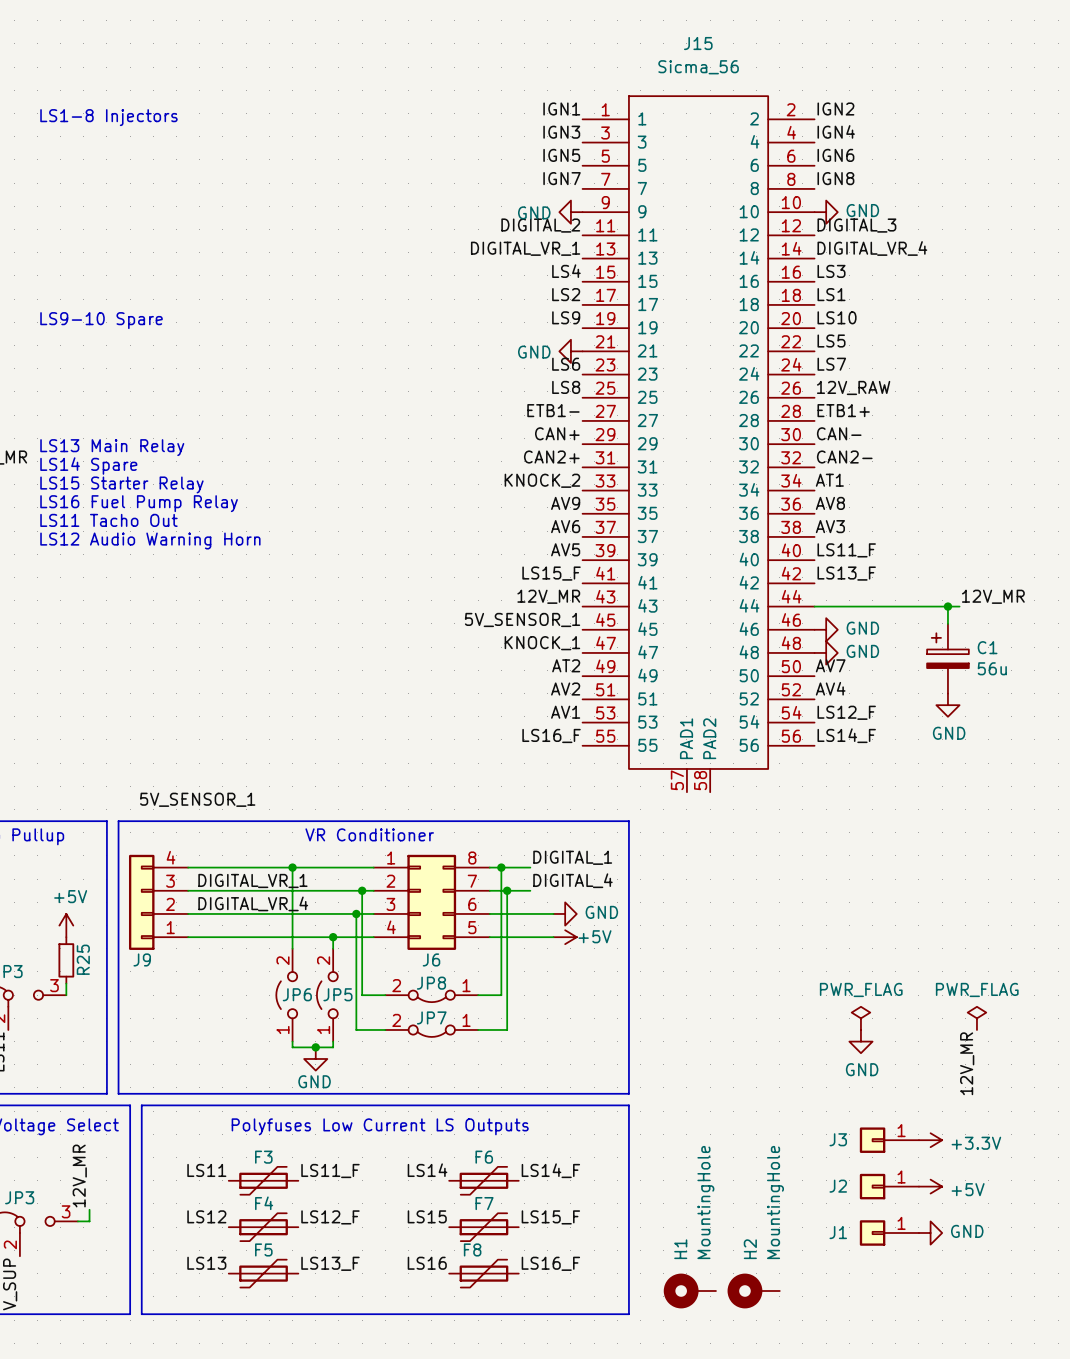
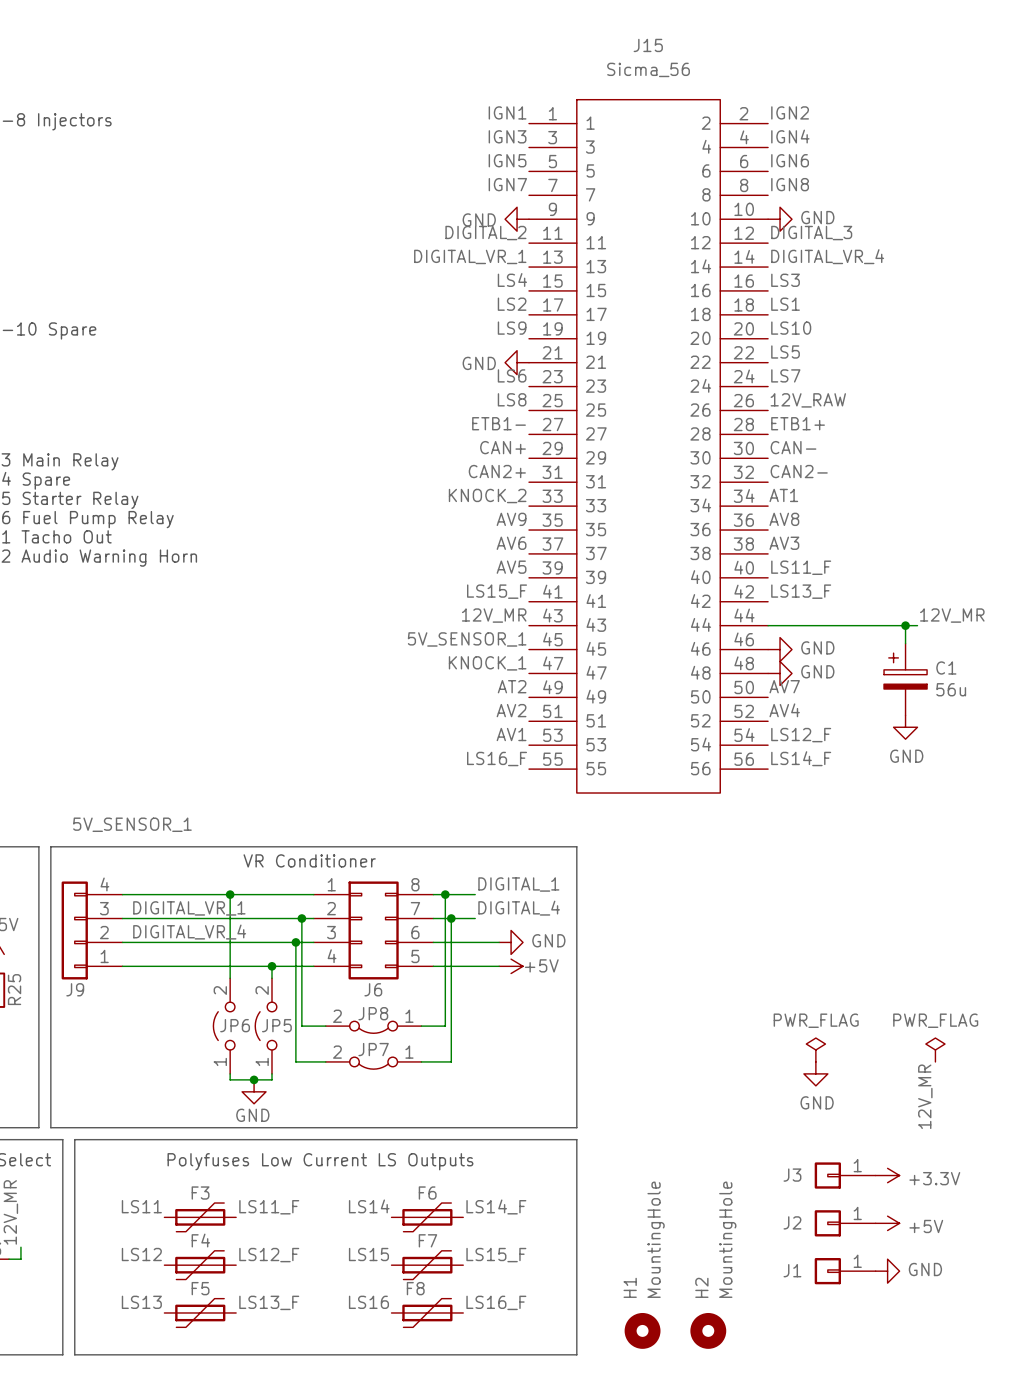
J15 symbol: [582, 95, 815, 793] -> [529, 98, 769, 794]
H1 symbol: [663, 1273, 716, 1309] -> [624, 1312, 661, 1349]
H2 symbol: [727, 1273, 780, 1309] -> [690, 1312, 727, 1349]

